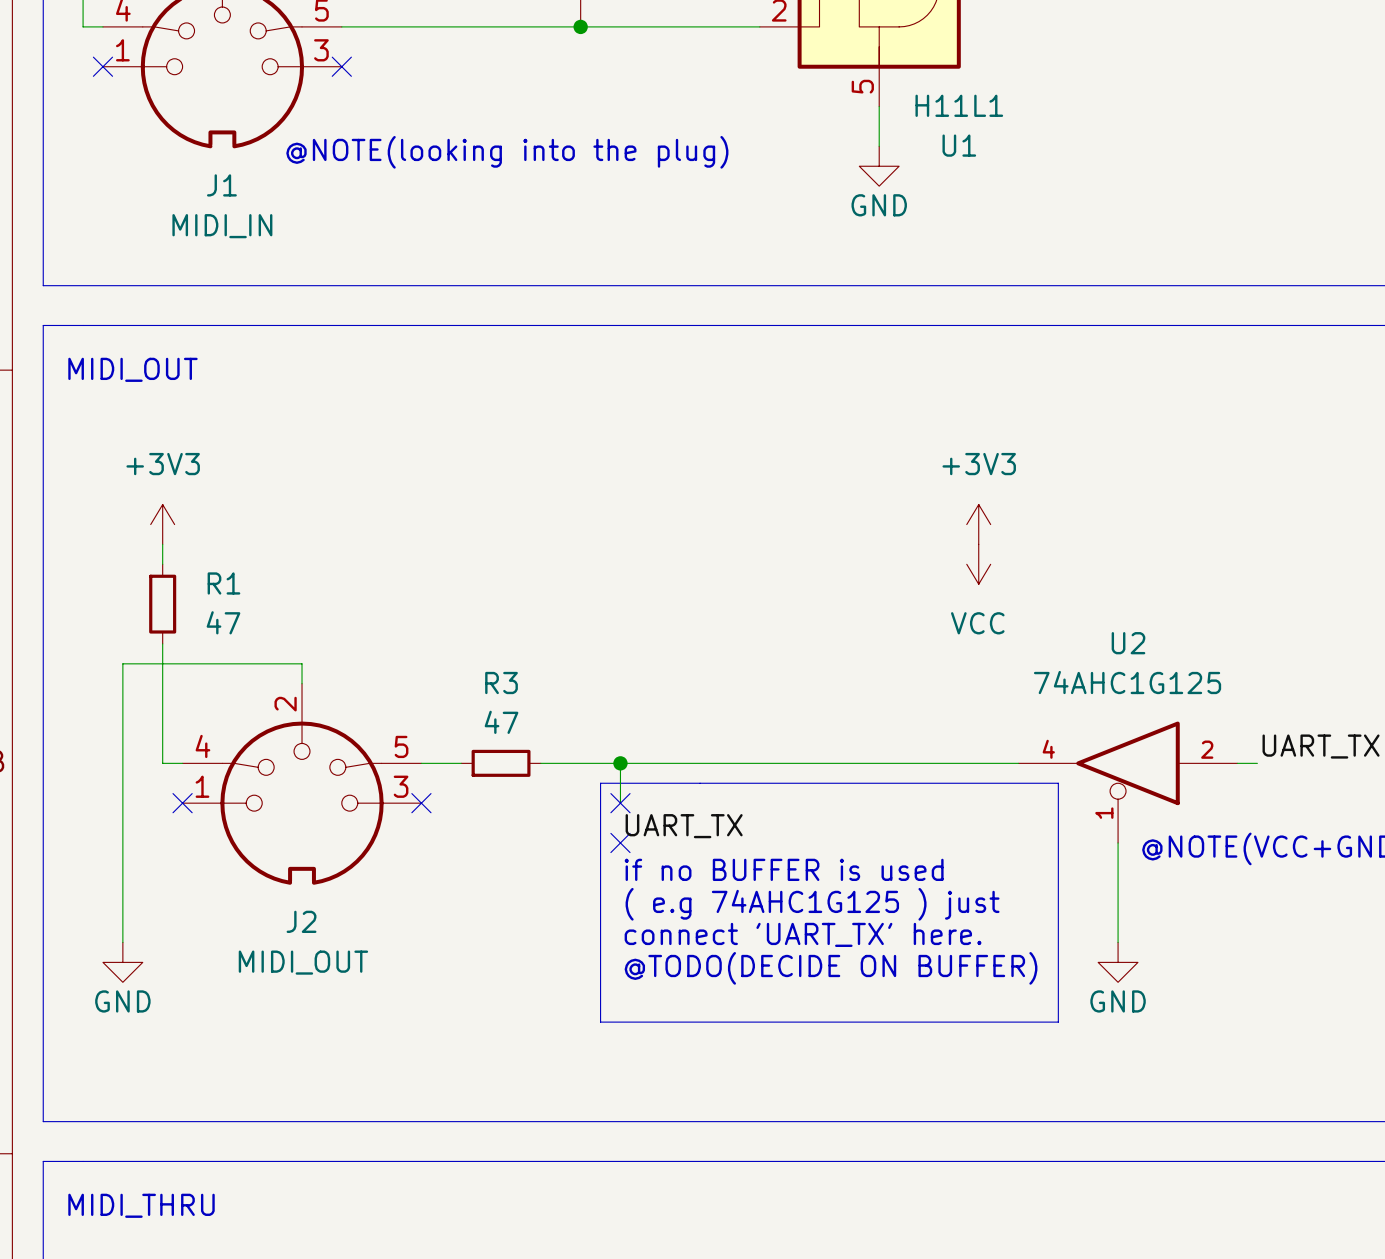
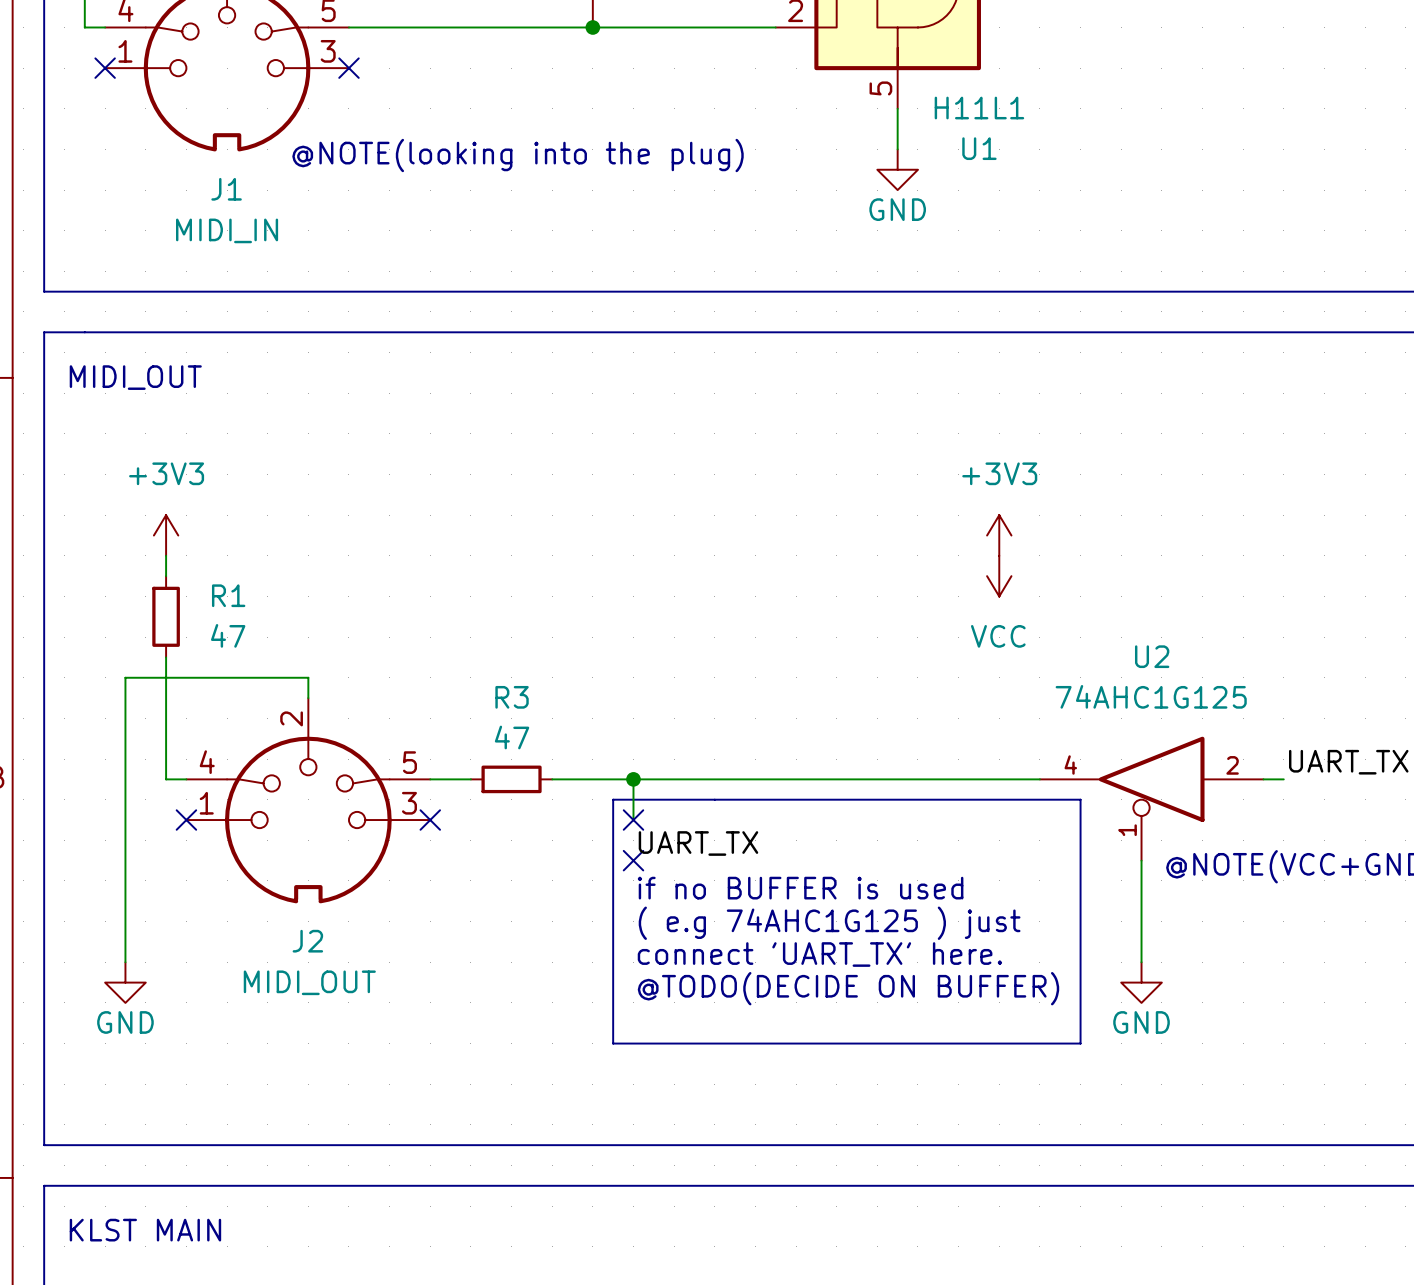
text: MIDI_THRU (141, 1205) -> KLST MAIN (145, 1230)

